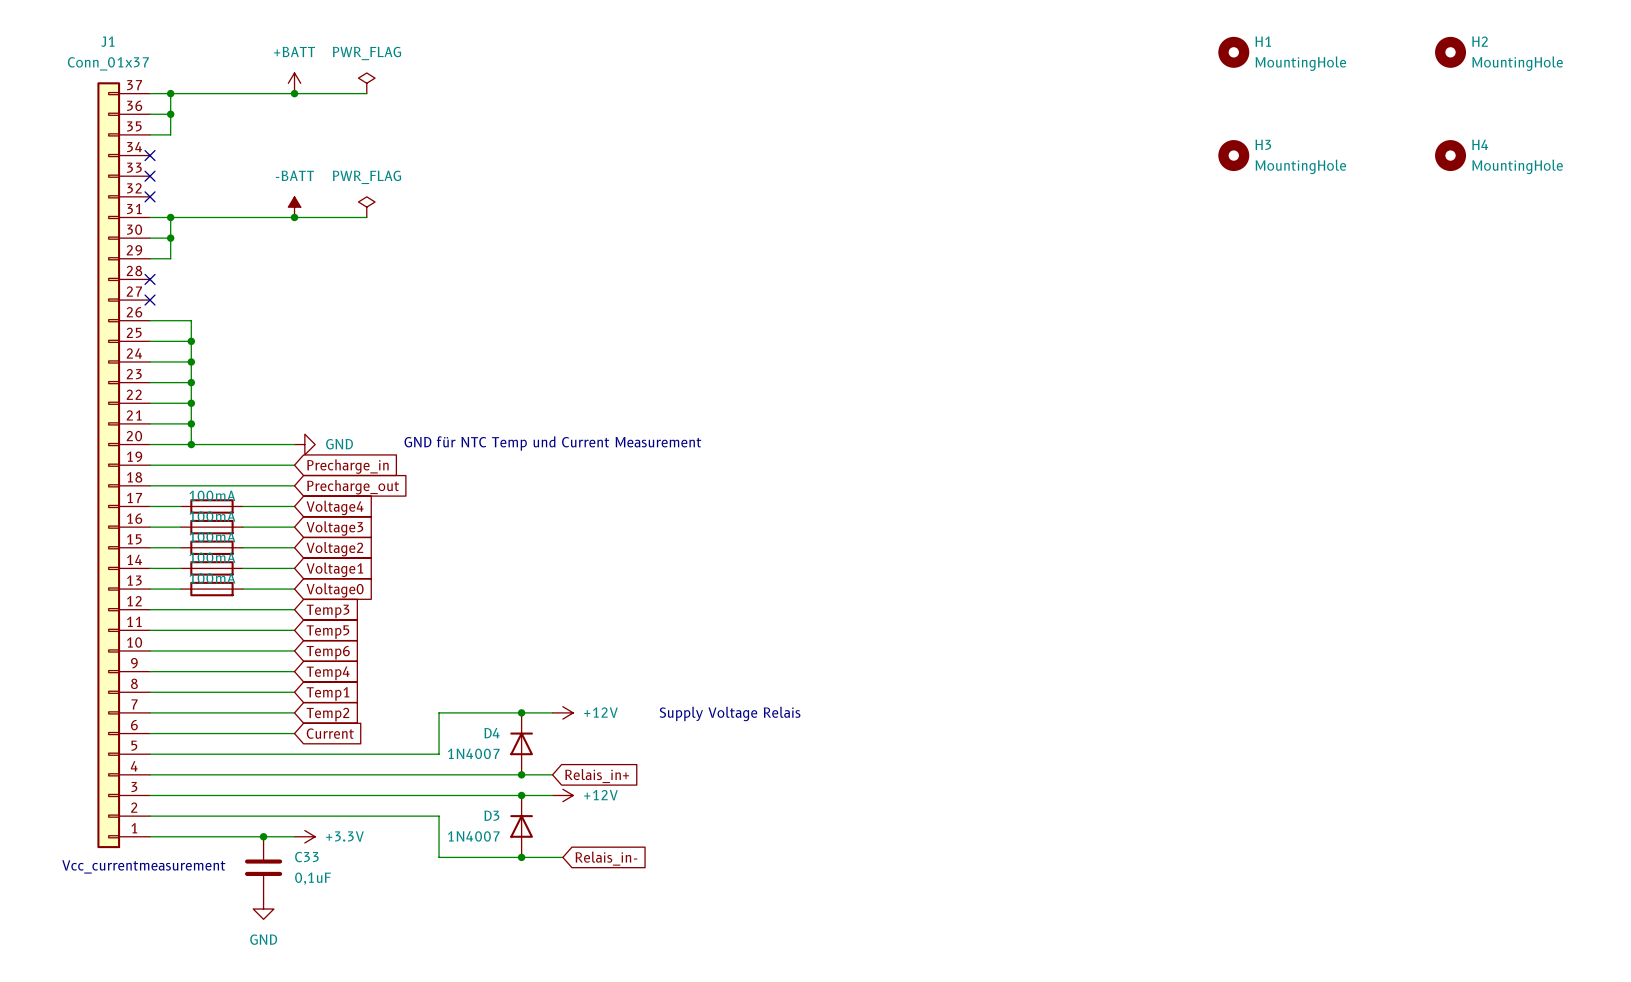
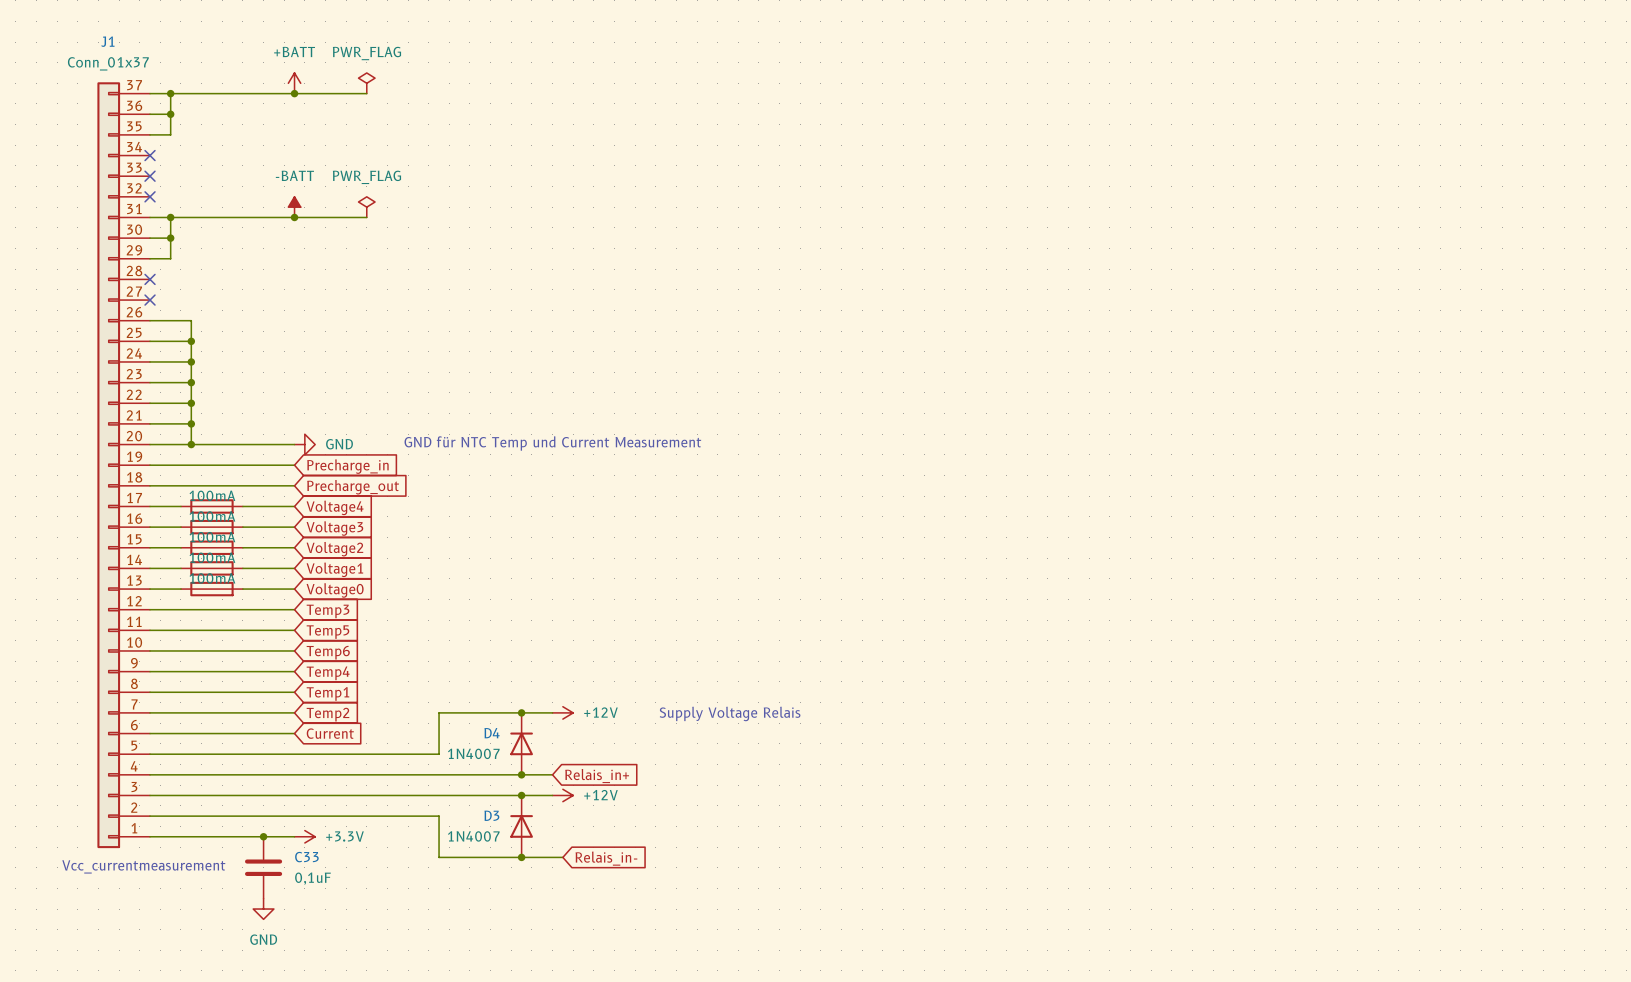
H1: MountingHole (1233, 52) -> none
H2: MountingHole (1450, 52) -> none
H3: MountingHole (1233, 155) -> none
H4: MountingHole (1450, 155) -> none

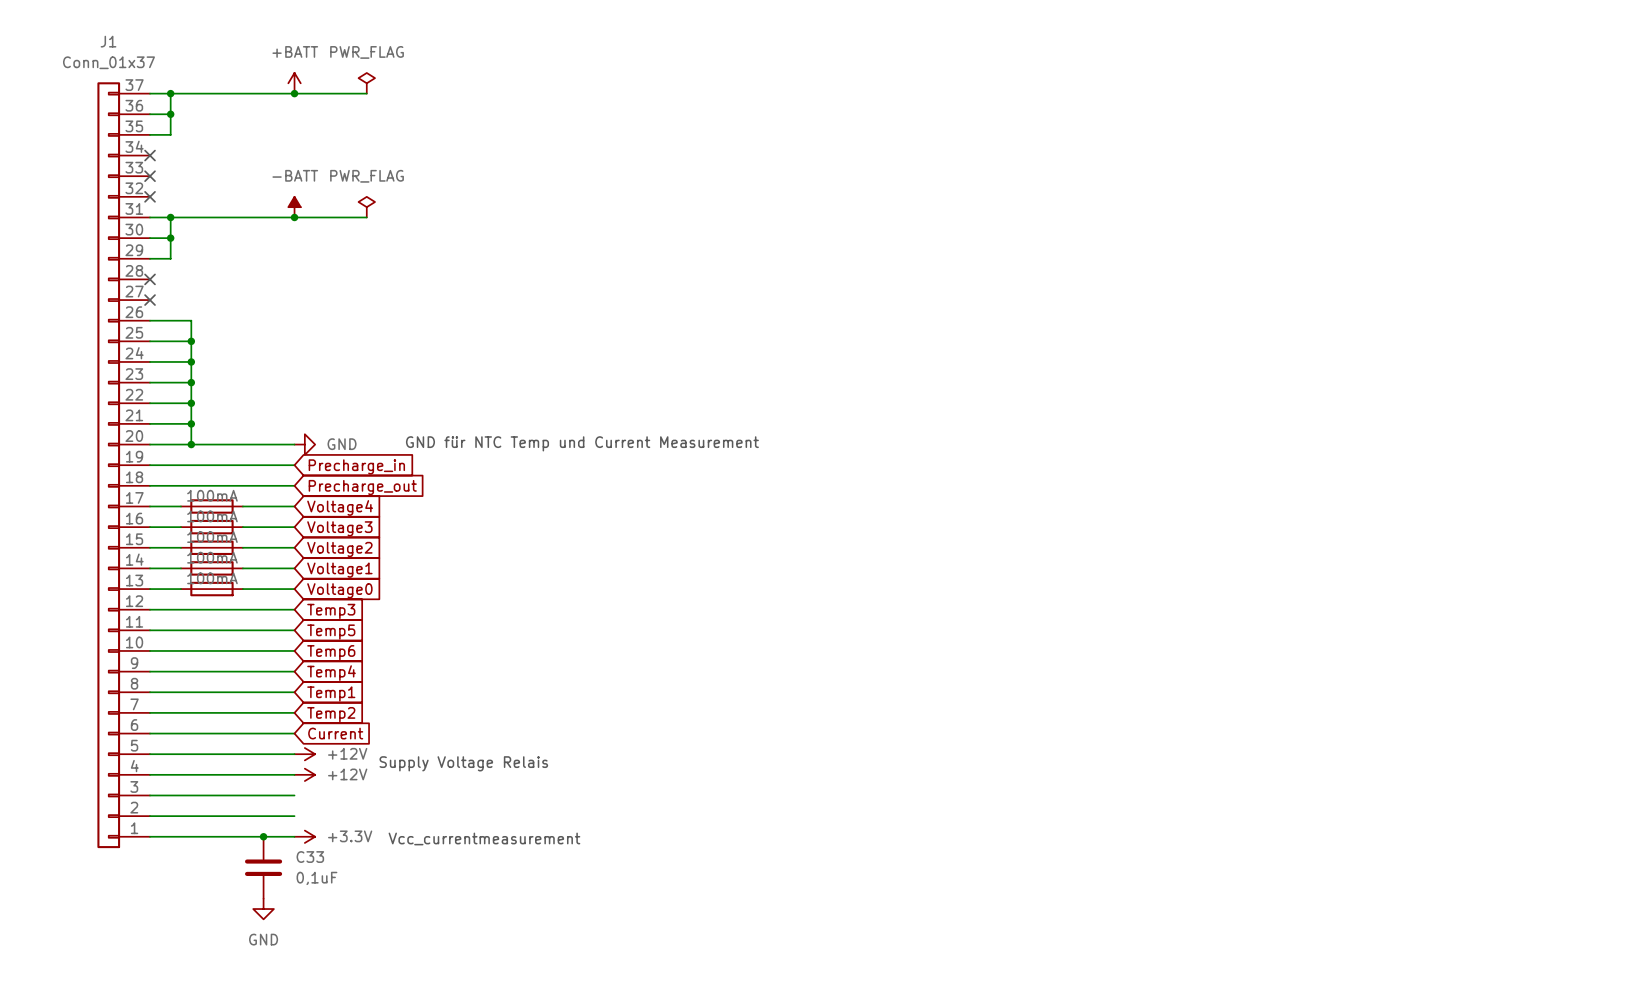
junction: (521, 712) -> none
wire: (552, 712) (439, 712) (439, 754) (294, 754) -> none
power symbol: +12V (562, 712) -> none
text: Supply Voltage Relais (730, 713) -> none
D4: 1N4007 (521, 743) -> none
power symbol: none -> +12V (304, 754)
text: none -> Supply Voltage Relais (463, 763)
wire: (294, 774) (552, 774) -> none
power symbol: none -> +12V (304, 774)
junction: (521, 774) -> none
global label: Relais_in+ (597, 776) -> none
wire: (294, 795) (552, 795) -> none
junction: (521, 795) -> none
power symbol: +12V (562, 795) -> none
wire: (294, 816) (439, 816) (439, 857) (562, 857) -> none
D3: 1N4007 (521, 826) -> none
text: none -> Vcc_currentmeasurement (484, 838)
junction: (521, 857) -> none
global label: Relais_in- (606, 858) -> none
text: Vcc_currentmeasurement (143, 866) -> none

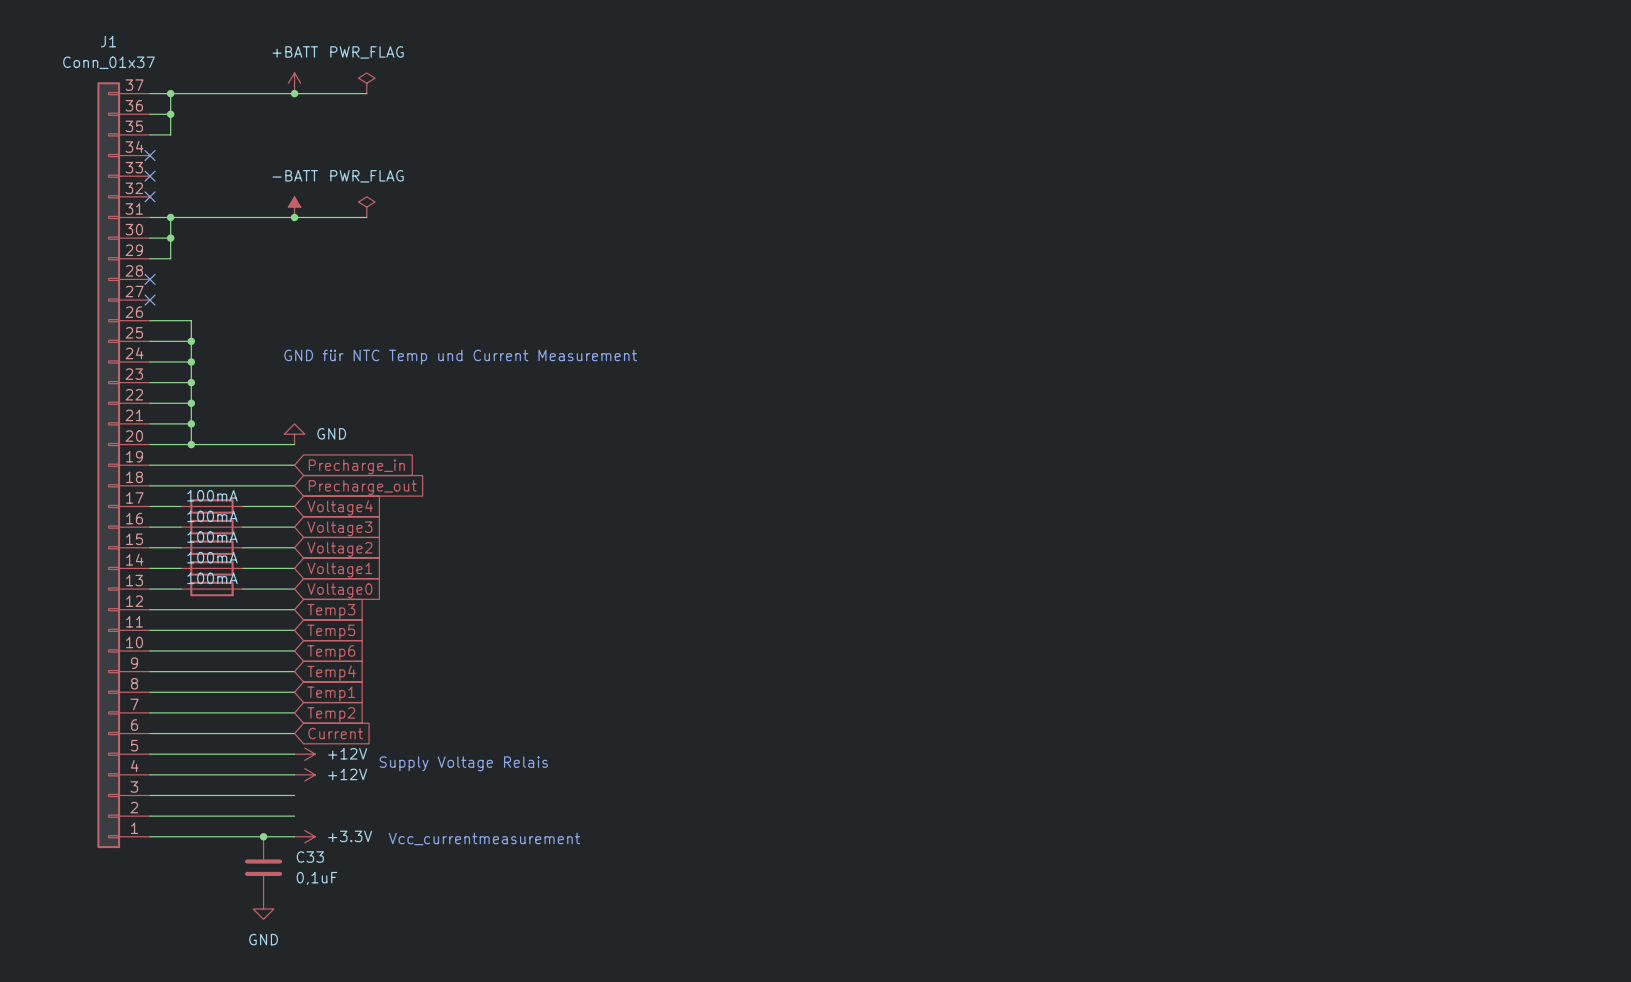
text position: GND für NTC Temp und Current Measurement (582, 443) -> GND für NTC Temp und Current Measurement (460, 357)
power symbol rotation: 0° (304, 444) -> 90° counterclockwise (294, 434)
power symbol position: GND (304, 444) -> GND (294, 434)

